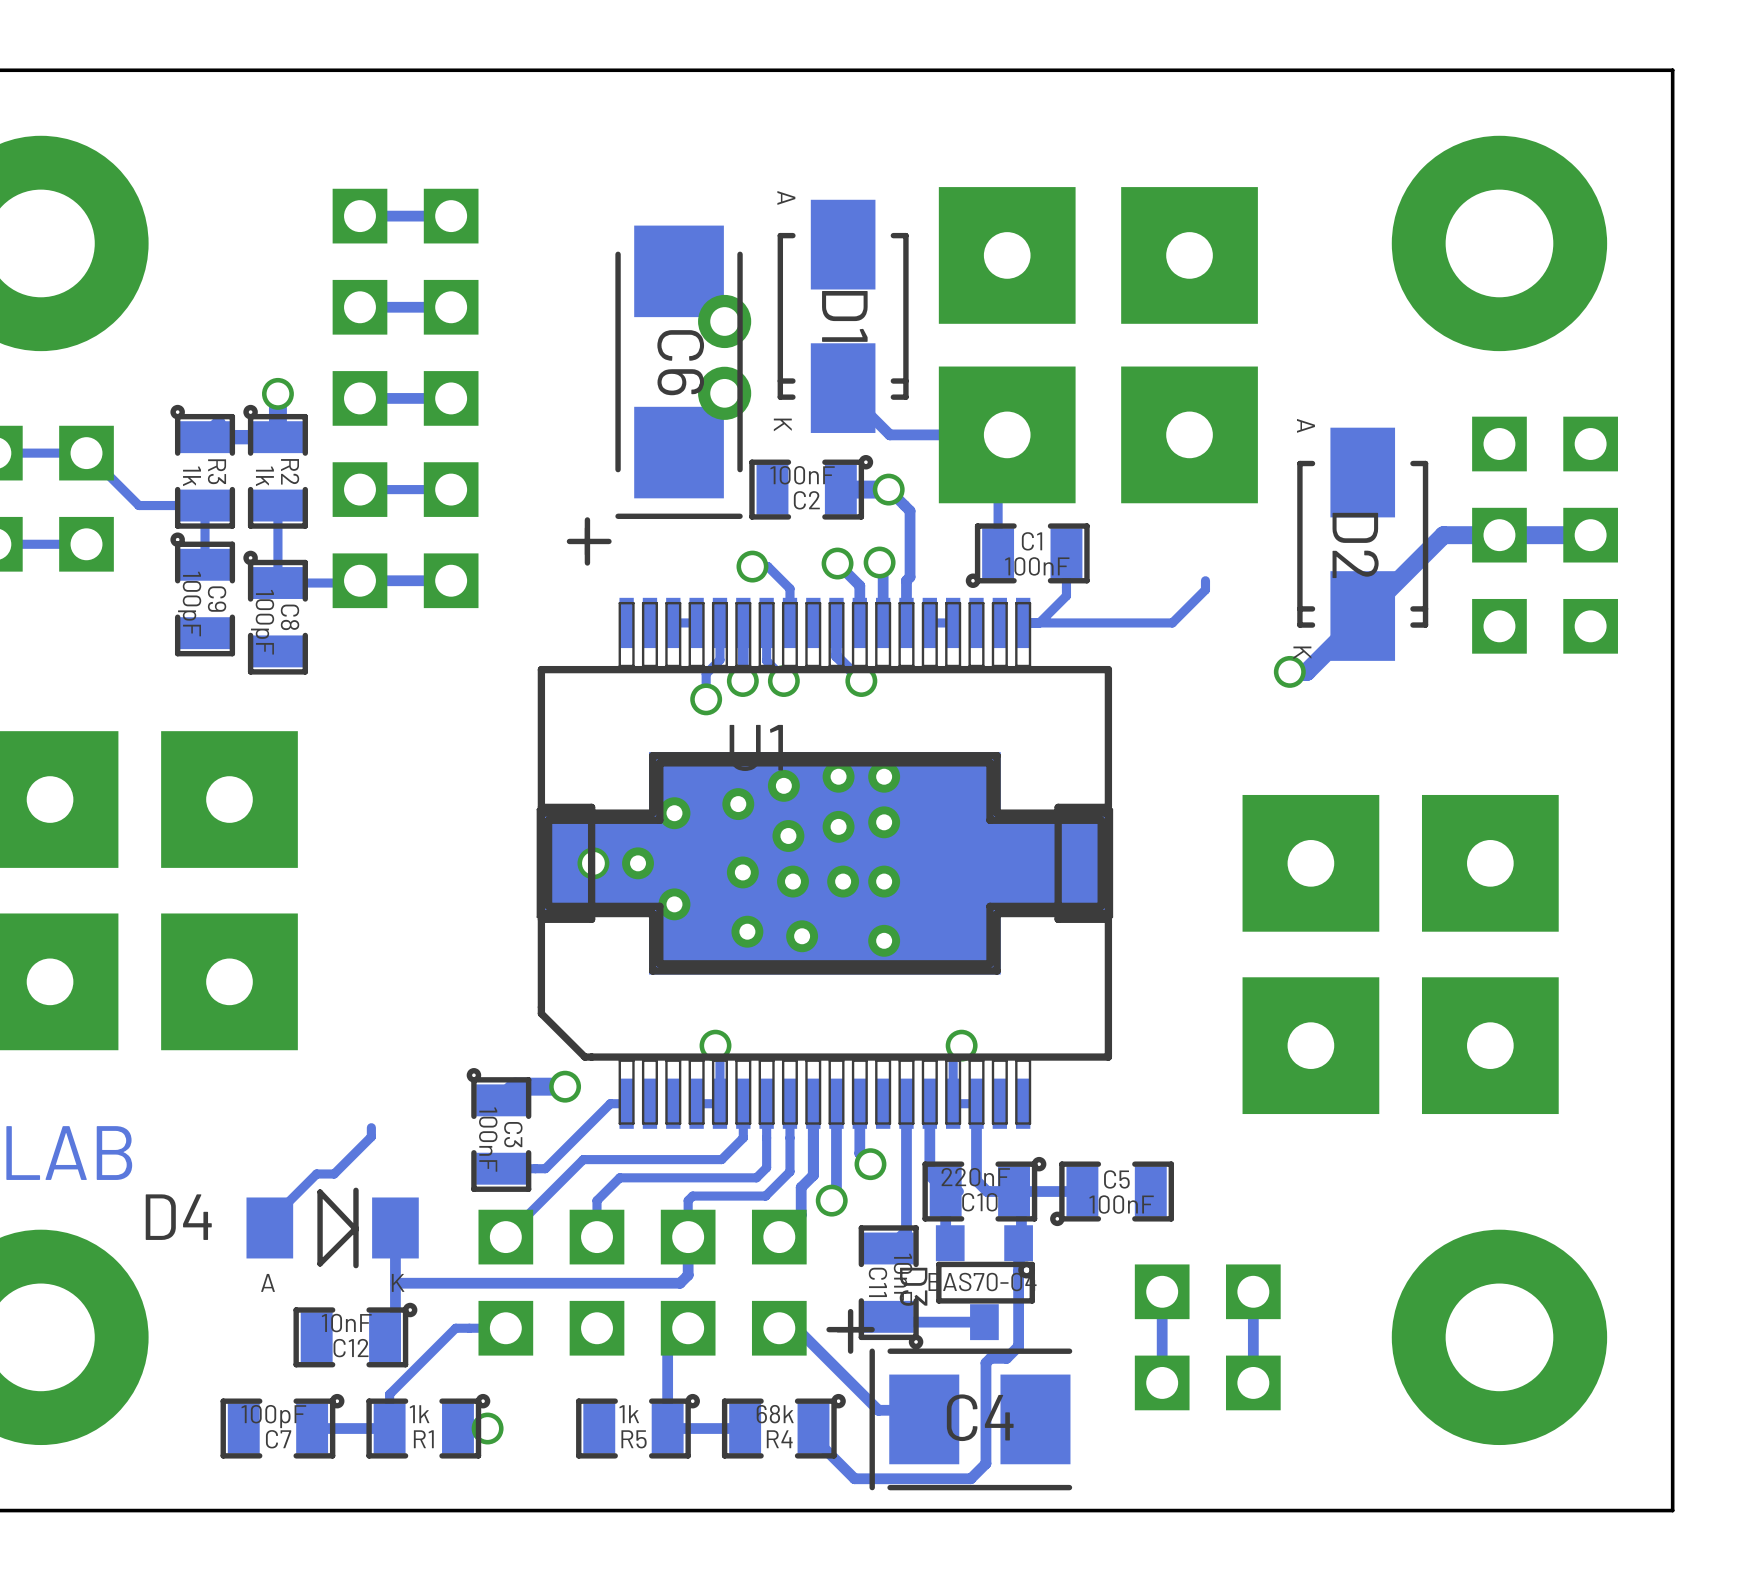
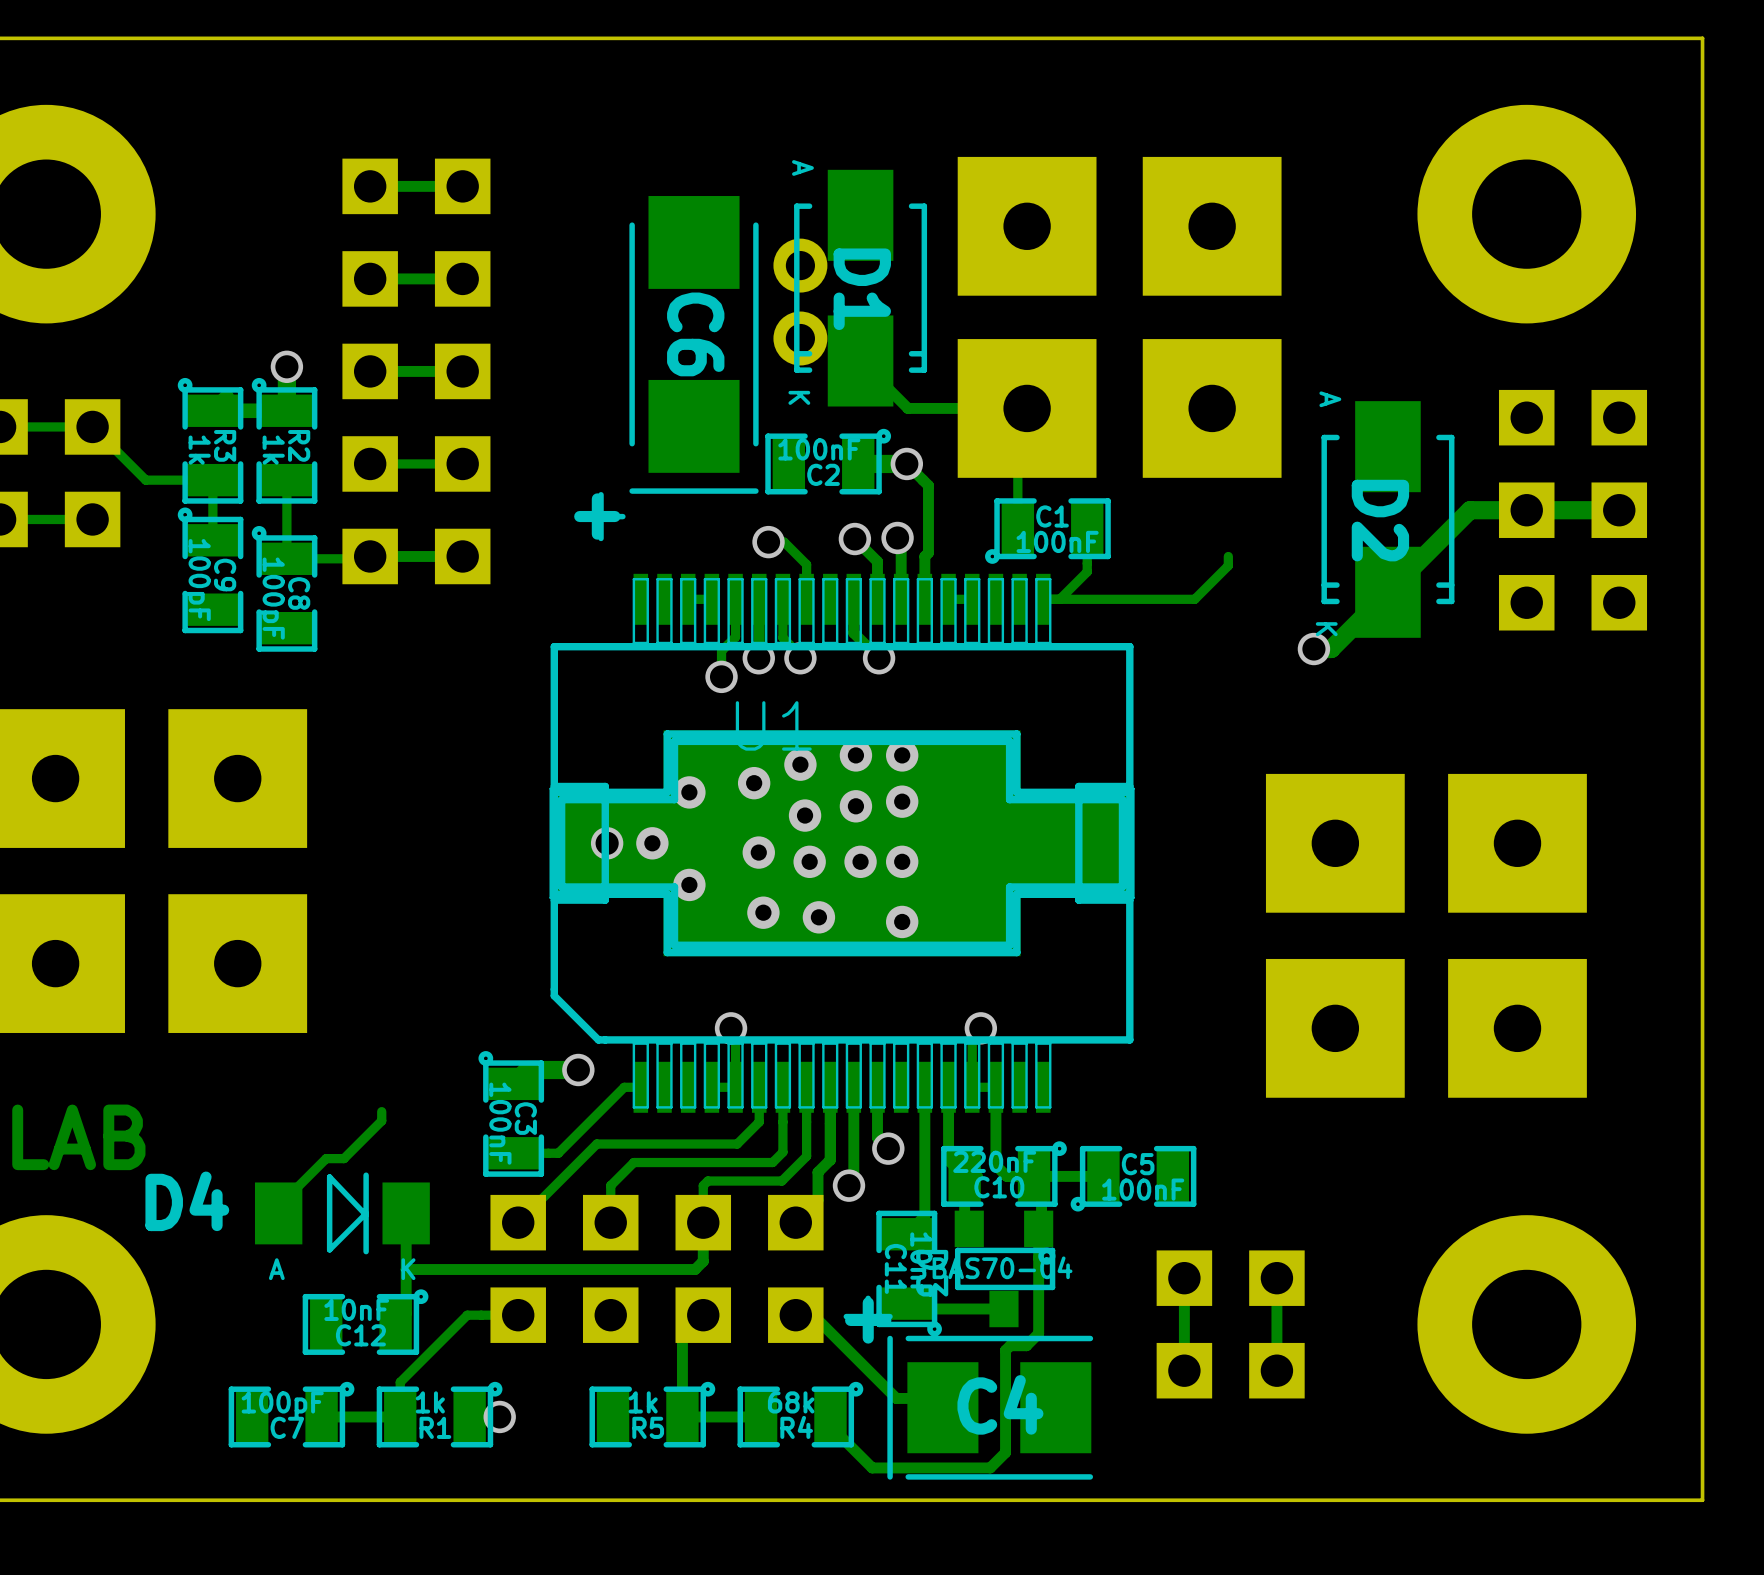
part position: (724, 357) -> (800, 302)

